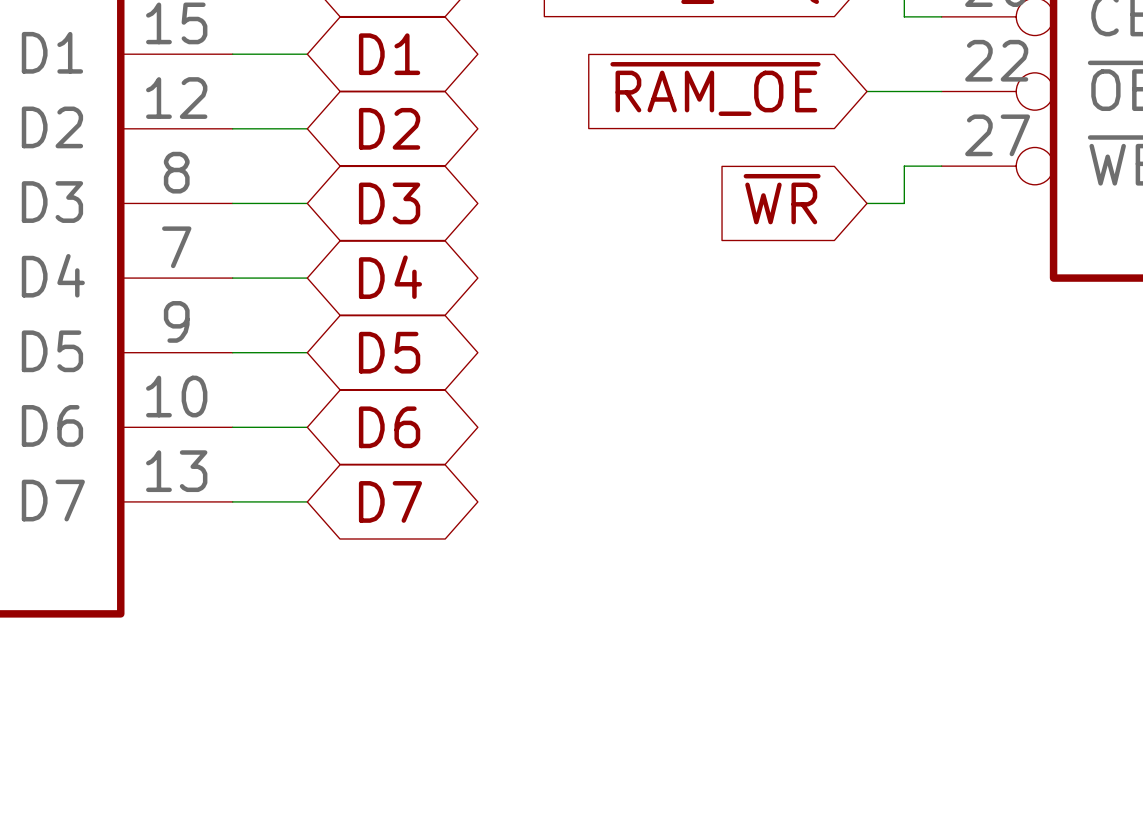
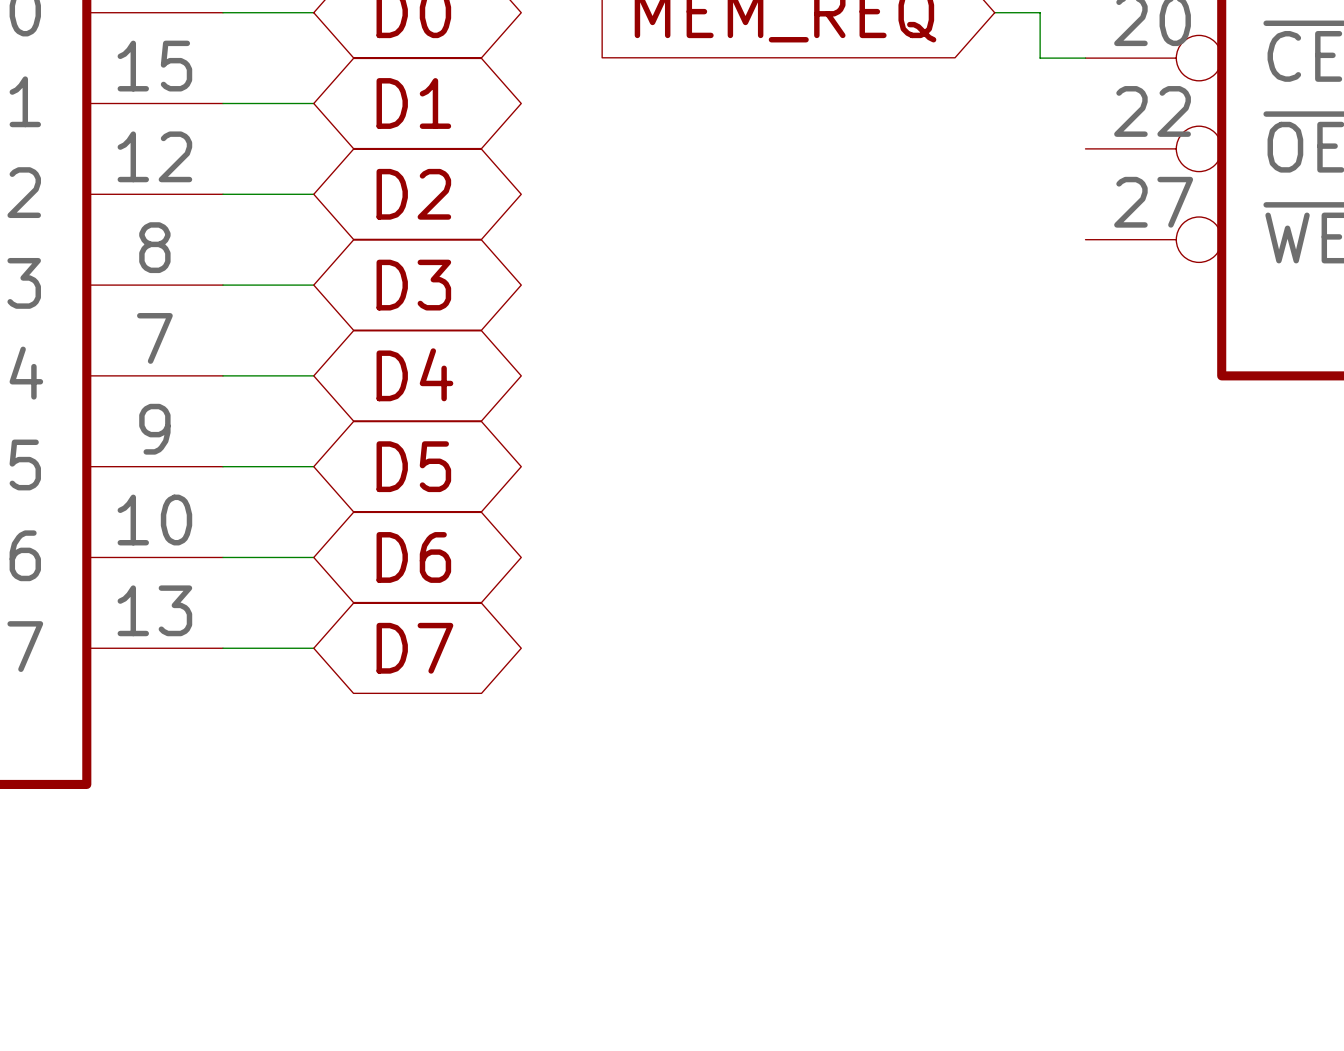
global label: ~{RAM_OE} (715, 88) -> none
wire: (867, 91) (941, 91) -> none
wire: (941, 166) (904, 166) (904, 203) (867, 203) -> none
global label: ~{WR} (782, 199) -> none

